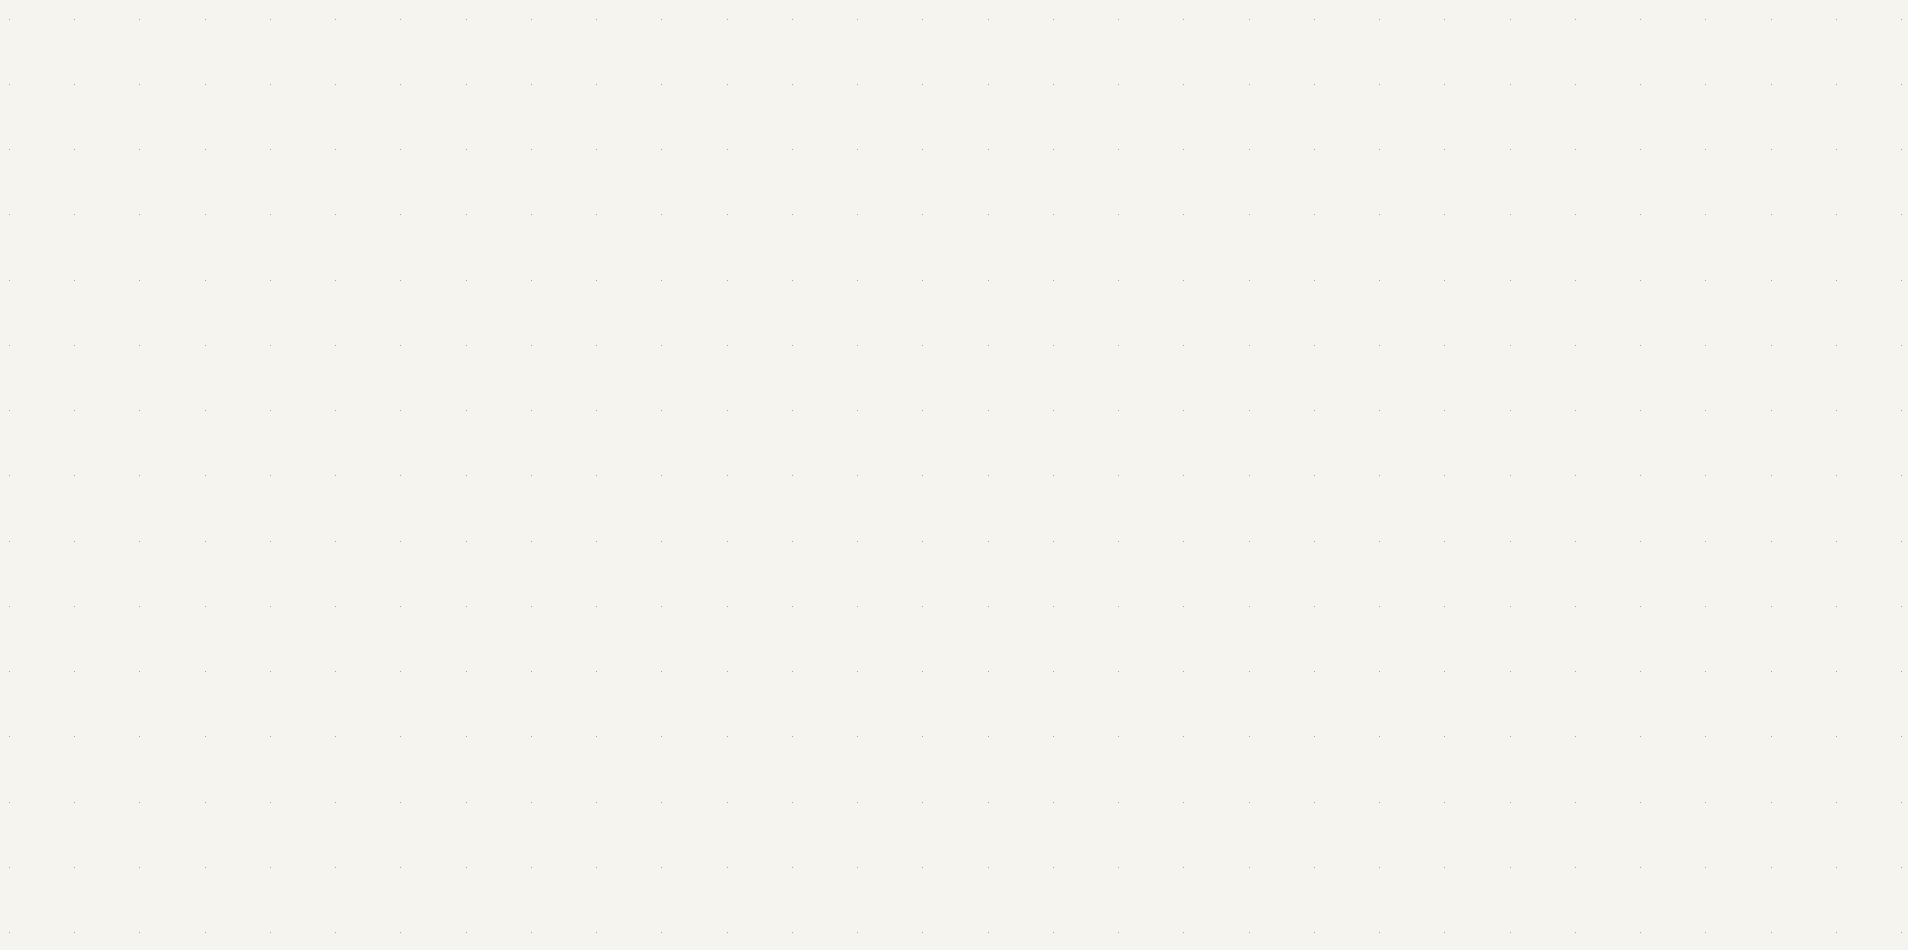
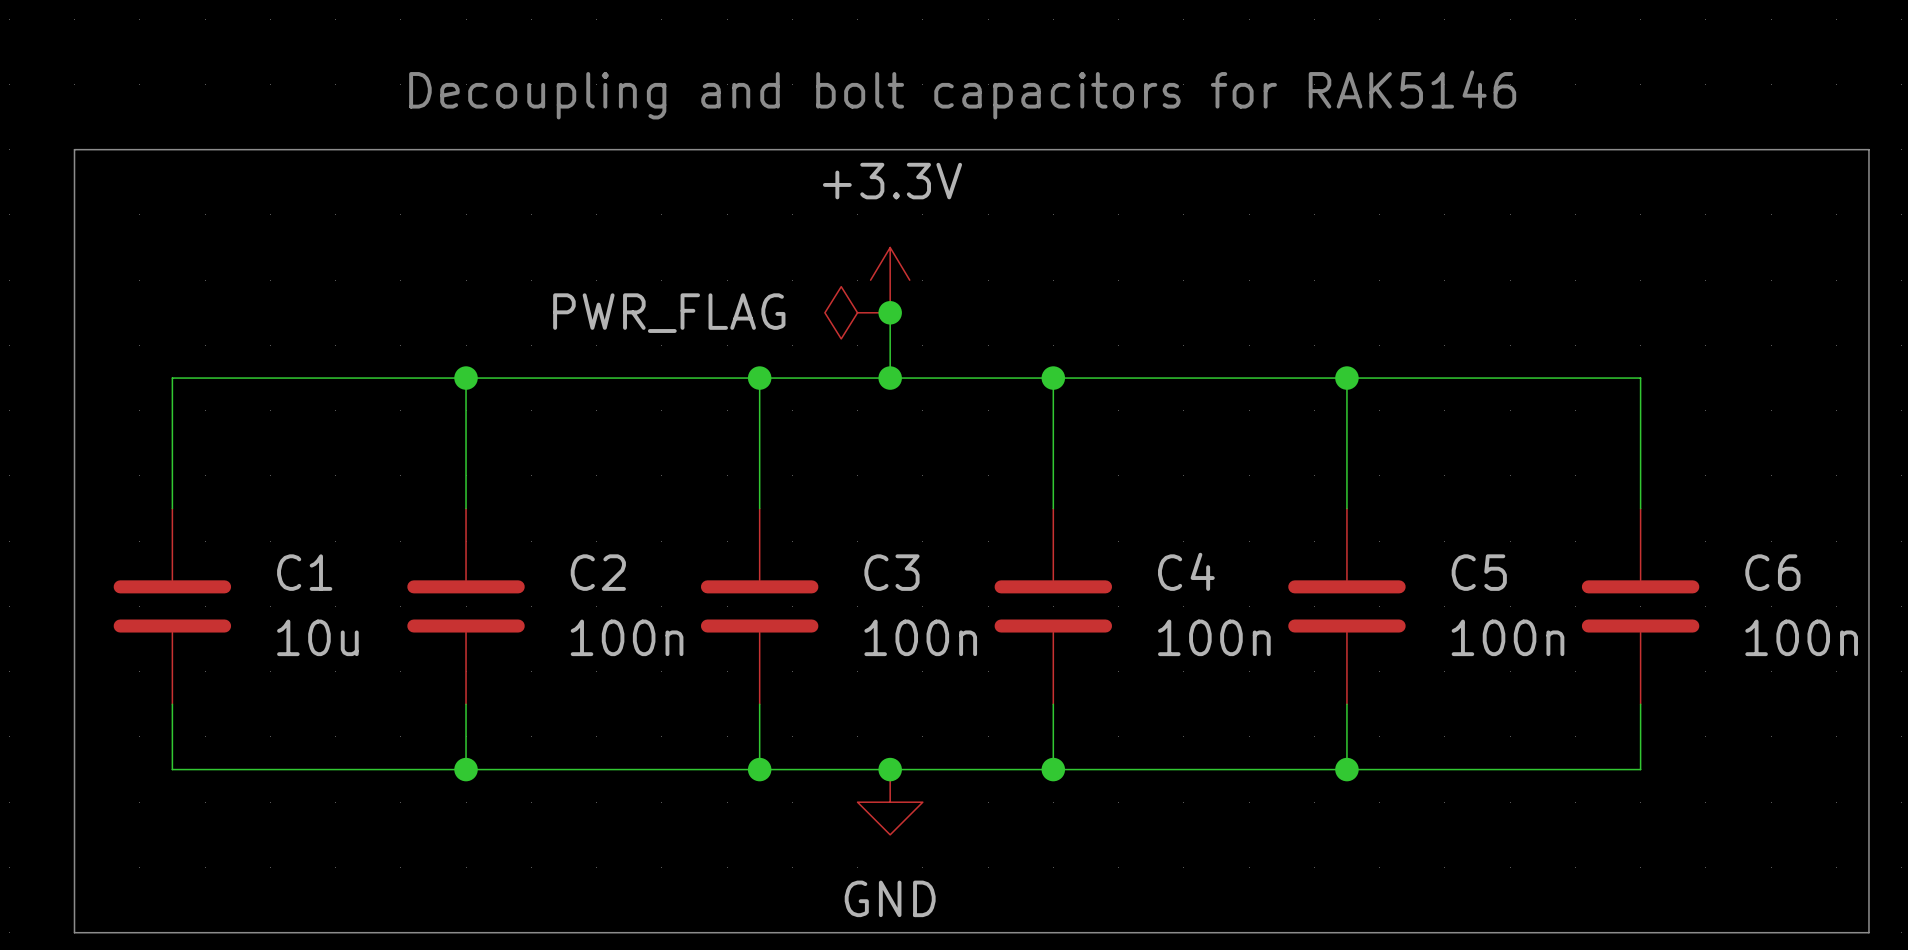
text: none -> Decoupling and bolt capacitors for RAK5146 (962, 94)
line: none -> (74, 149) (74, 932) (1868, 932) (1868, 149) (74, 149)
power symbol: none -> +3.3V (890, 280)
power symbol: none -> PWR_FLAG (857, 312)
wire: none -> (890, 312) (890, 378)
junction: none -> (890, 312)
wire: none -> (466, 378) (466, 508)
junction: none -> (466, 378)
wire: none -> (759, 378) (759, 508)
junction: none -> (759, 378)
junction: none -> (890, 378)
wire: none -> (1053, 378) (1053, 508)
junction: none -> (1053, 378)
wire: none -> (1346, 378) (1346, 508)
junction: none -> (1346, 378)
wire: none -> (172, 508) (172, 378) (1640, 378) (1640, 508)
C1: none -> 10u (172, 606)
C2: none -> 100n (466, 606)
C3: none -> 100n (759, 606)
C4: none -> 100n (1053, 606)
C5: none -> 100n (1346, 606)
C6: none -> 100n (1640, 606)
wire: none -> (172, 704) (172, 769) (1640, 769) (1640, 704)
wire: none -> (466, 704) (466, 769)
wire: none -> (759, 704) (759, 769)
wire: none -> (1053, 704) (1053, 769)
wire: none -> (1346, 704) (1346, 769)
junction: none -> (466, 769)
junction: none -> (759, 769)
junction: none -> (890, 769)
junction: none -> (1053, 769)
junction: none -> (1346, 769)
power symbol: none -> GND (890, 802)

